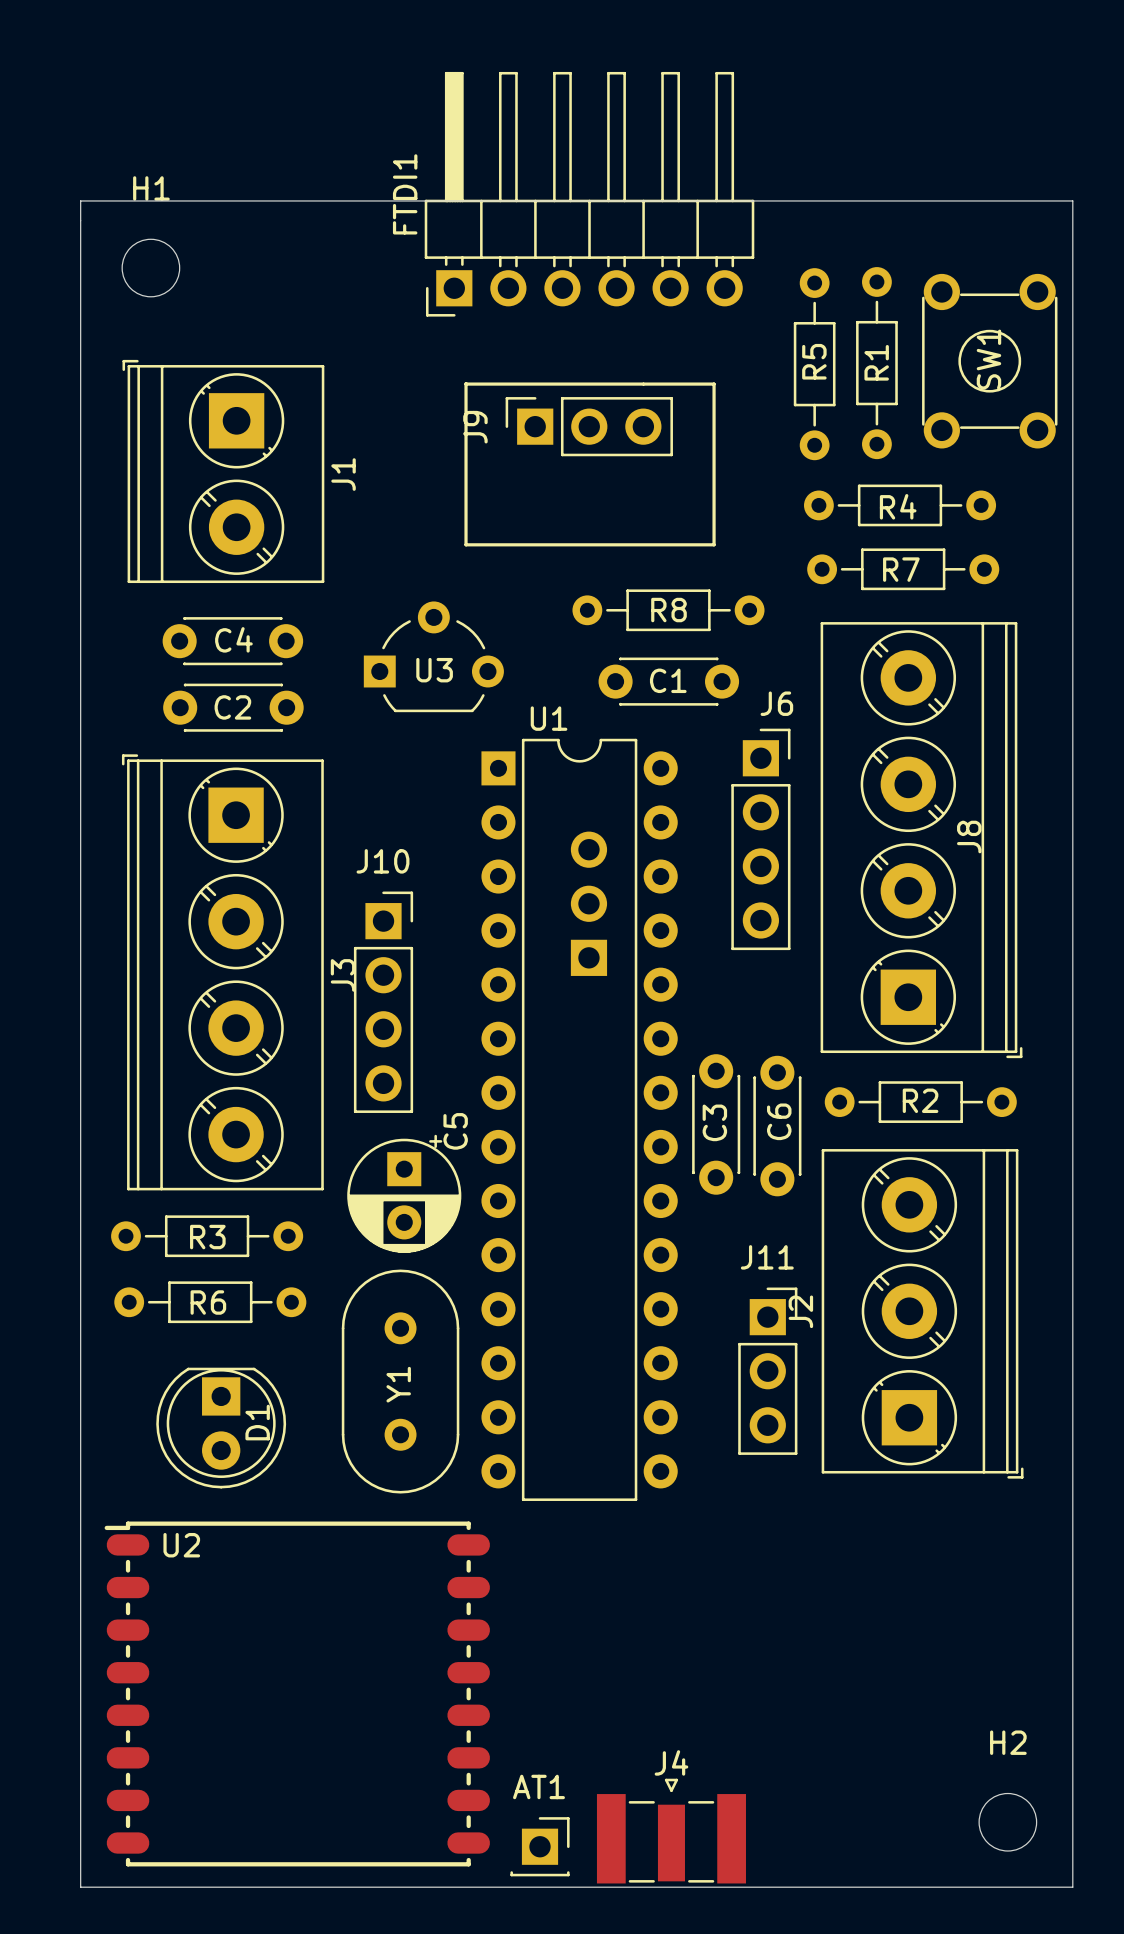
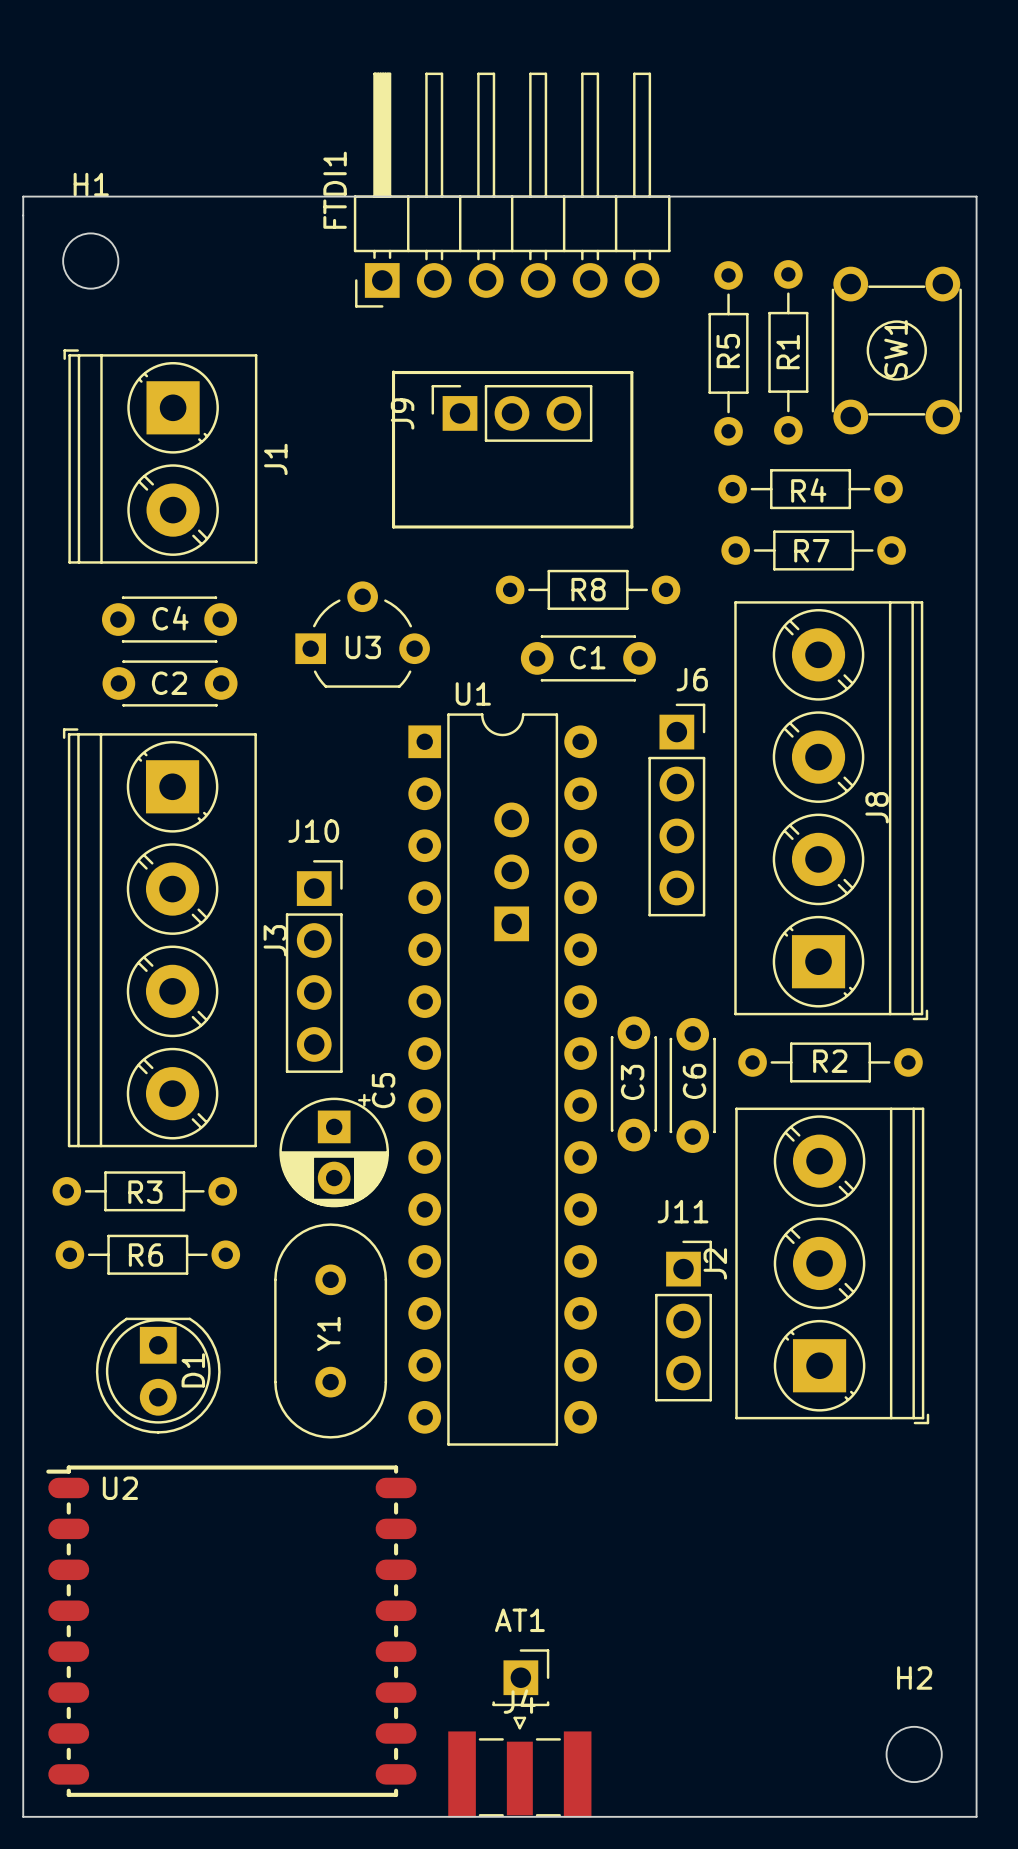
J4 position: (671, 1831) -> (519, 1767)
AT1 position: (540, 1846) -> (520, 1677)

